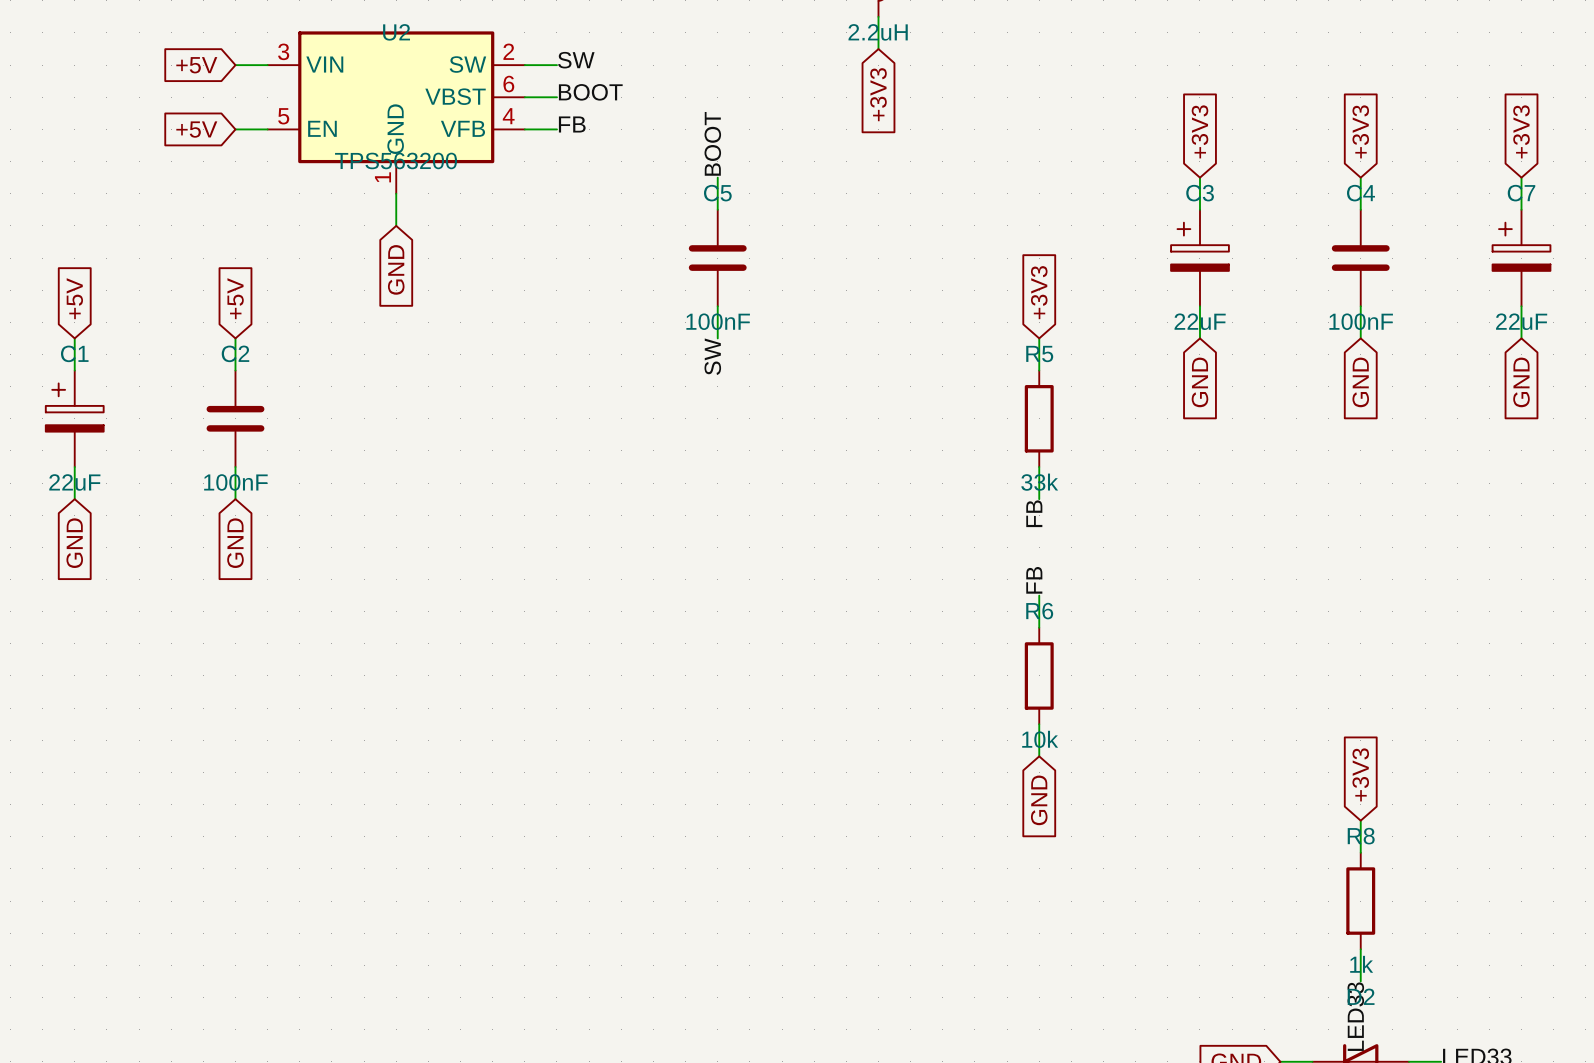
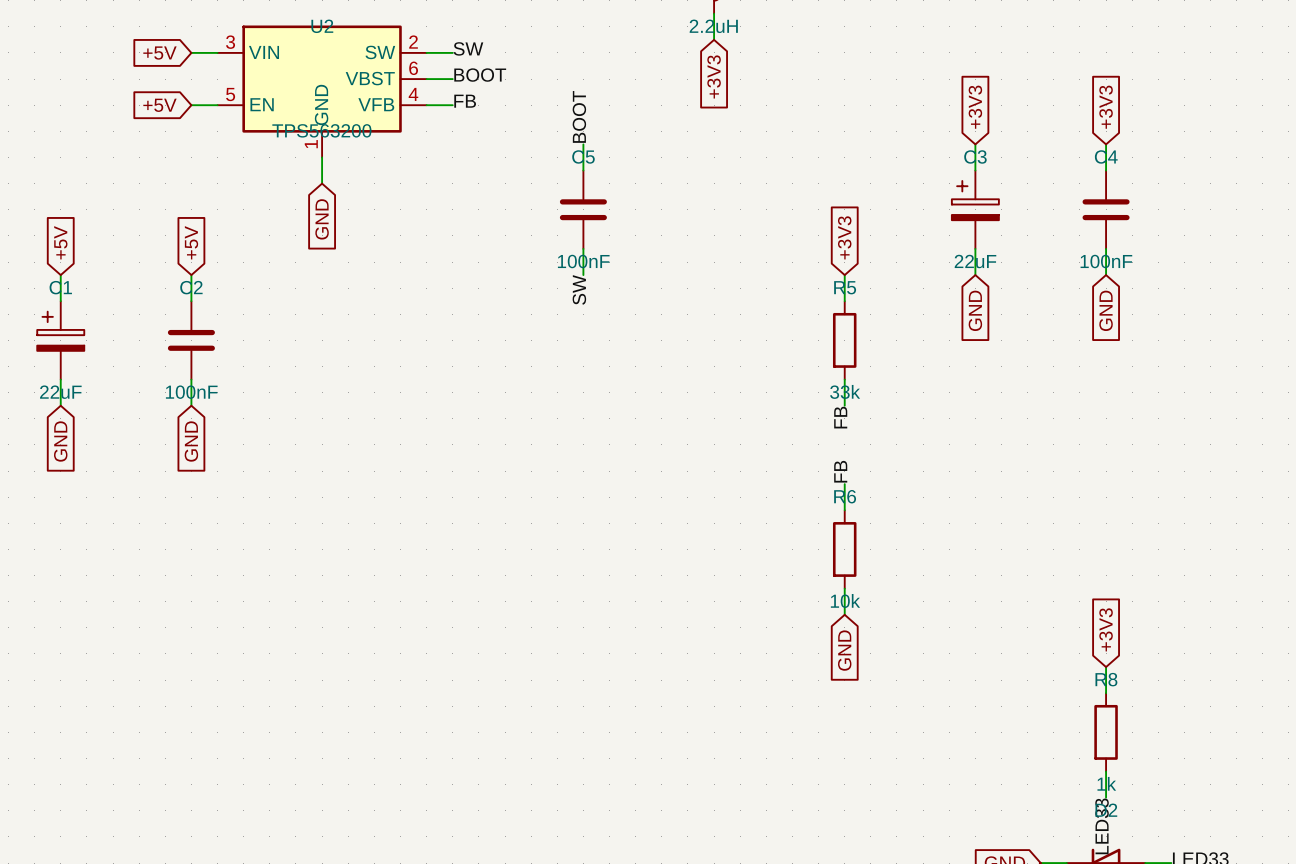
global label: +3V3 (1521, 131) -> none
wire: (1521, 177) (1521, 209) -> none
C7: 22uF (1521, 258) -> none
wire: (1521, 306) (1521, 338) -> none
global label: GND (1521, 382) -> none

